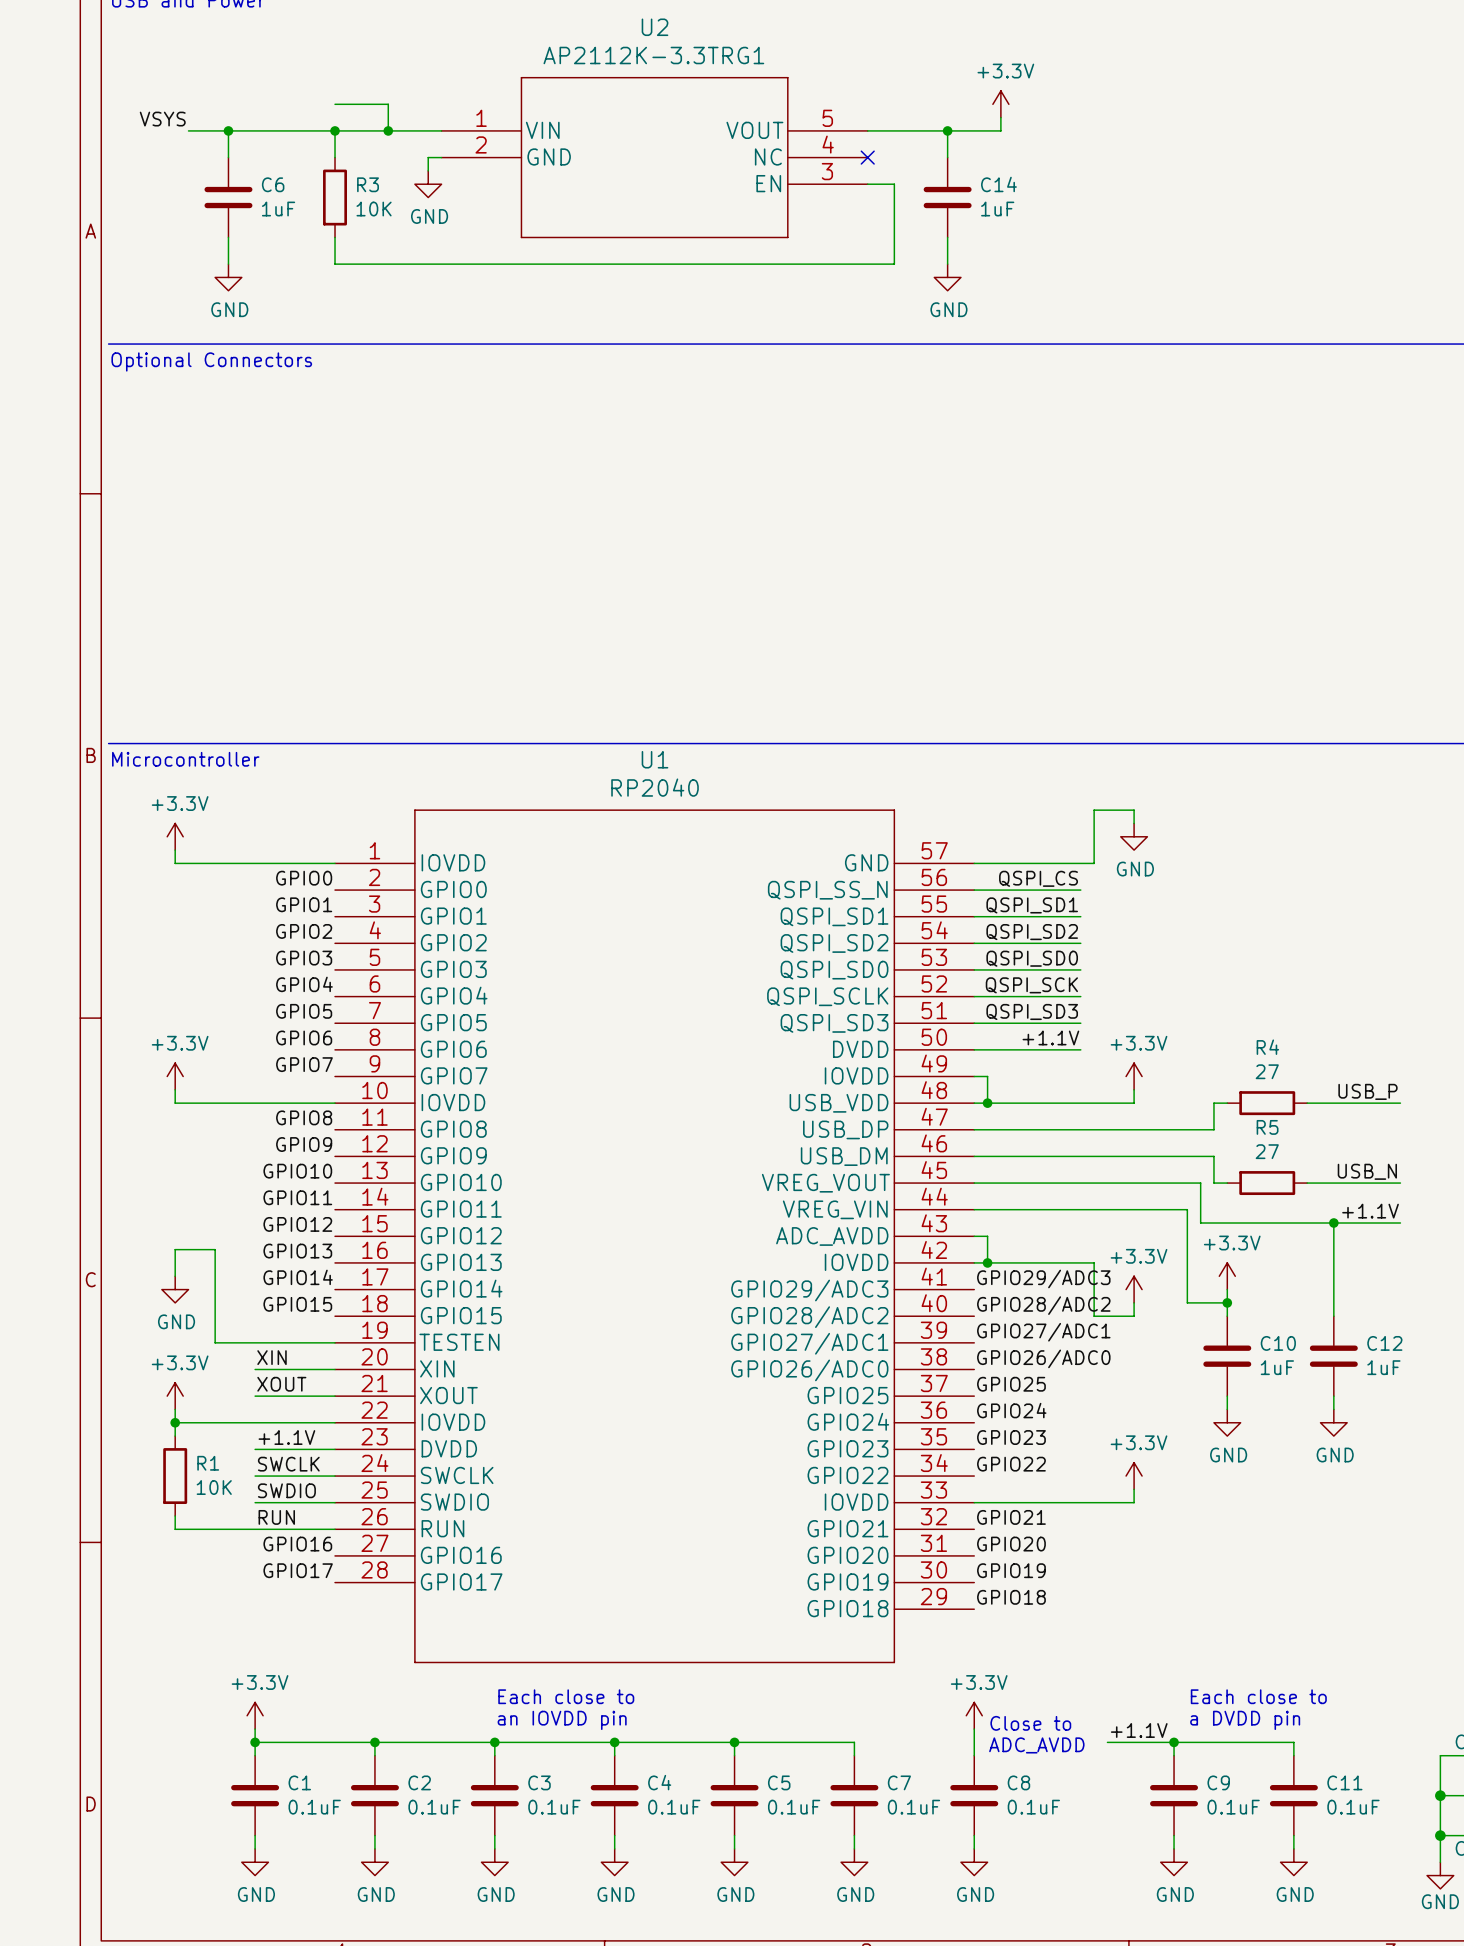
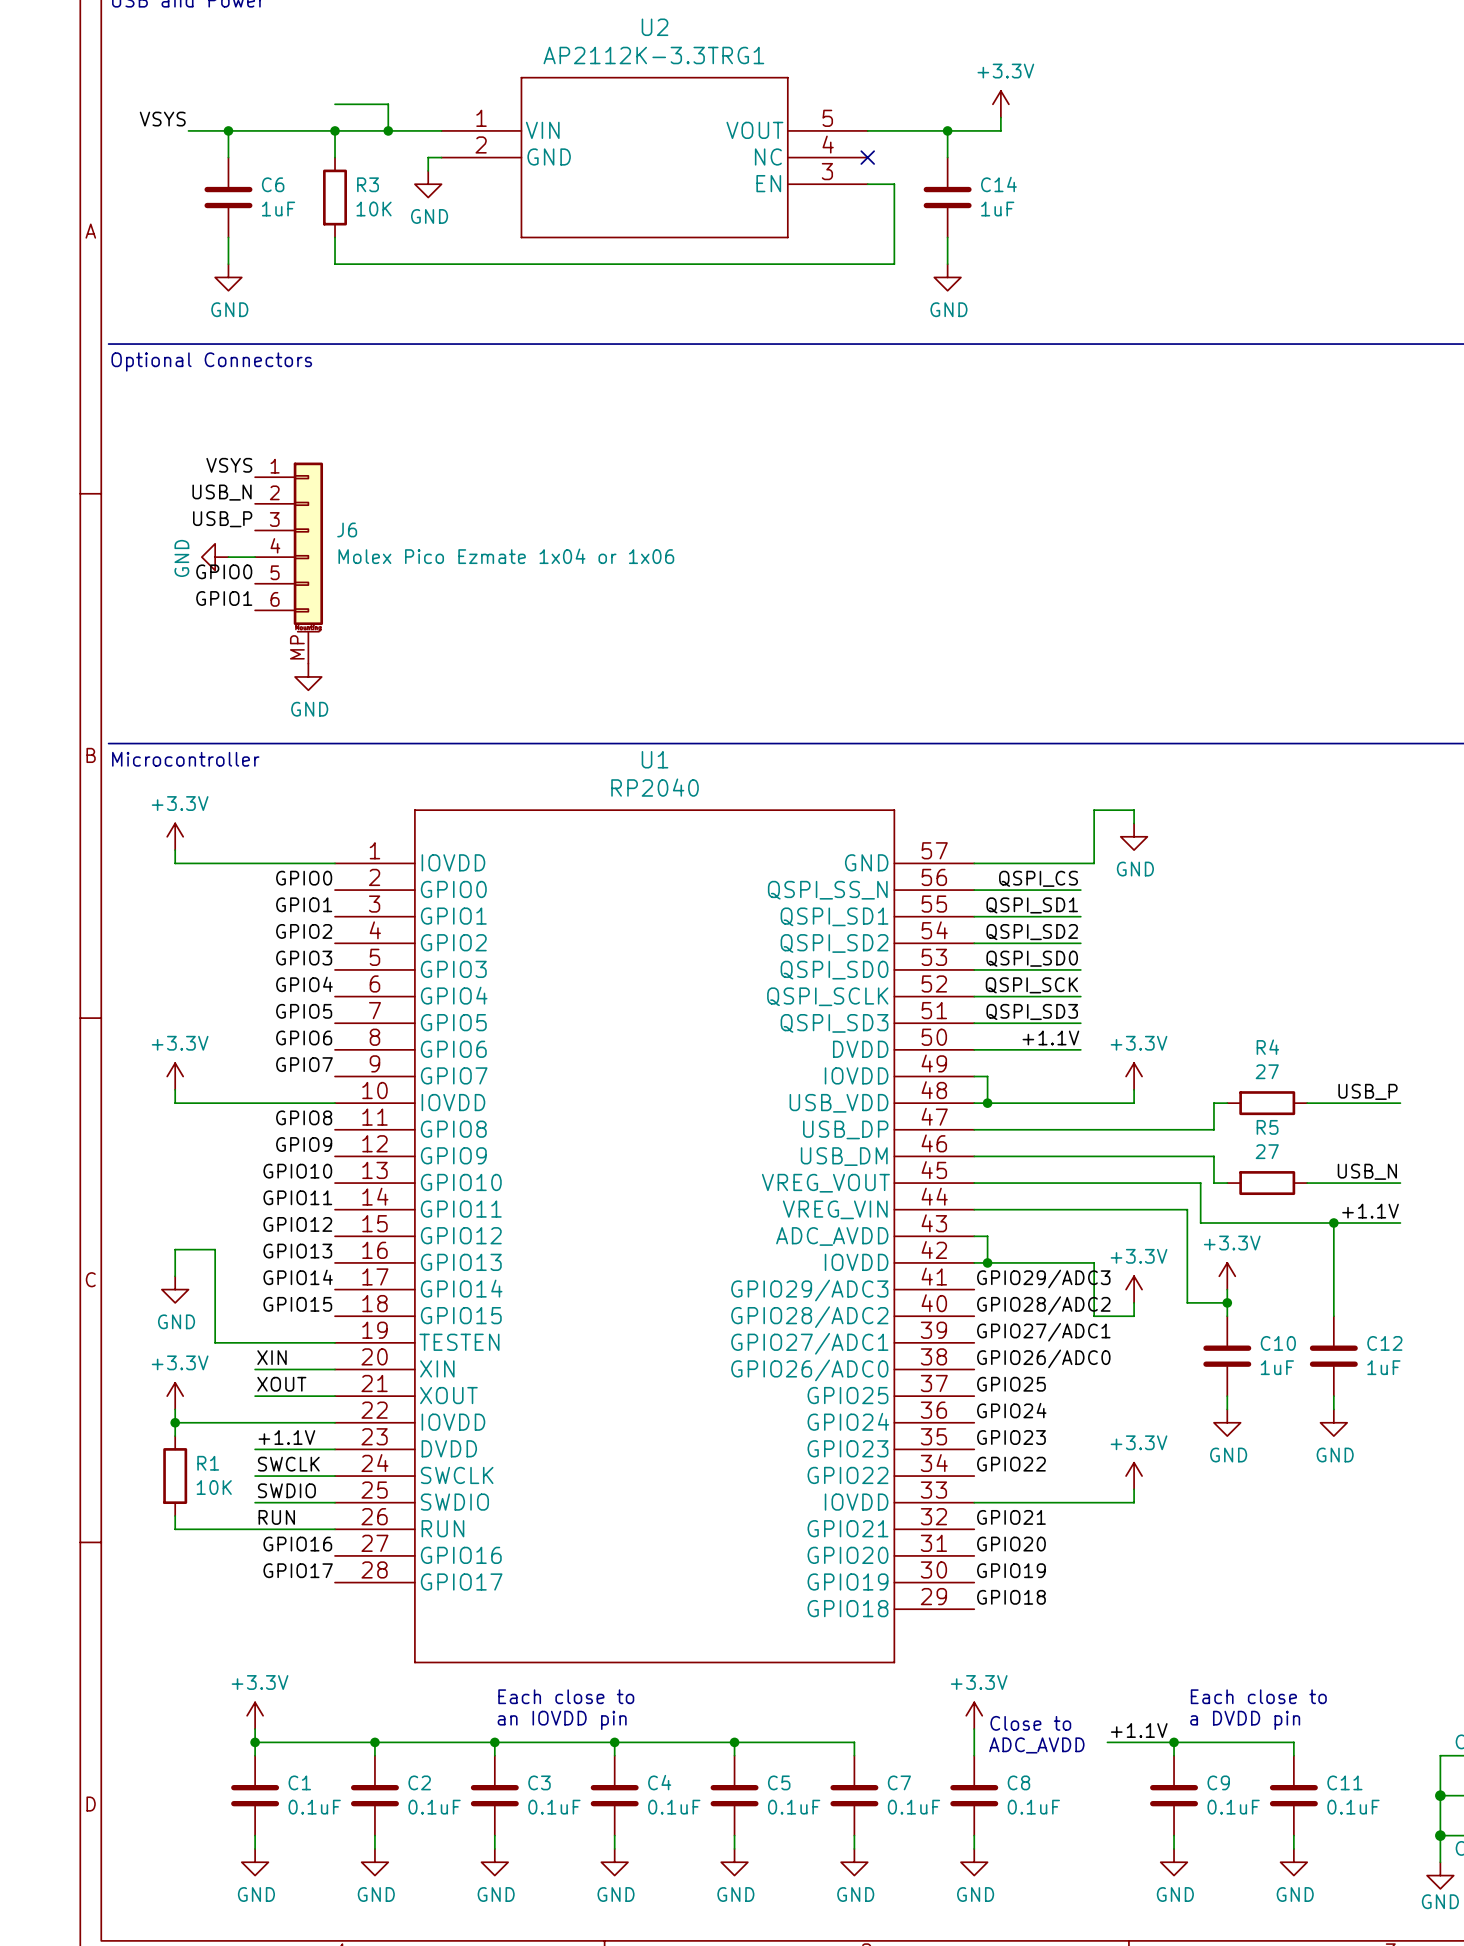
label: none -> VSYS (229, 465)
label: none -> USB_N (222, 492)
label: none -> USB_P (222, 519)
power symbol: none -> GND (215, 557)
wire: none -> (228, 557) (255, 557)
J6: none -> Molex Pico Ezmate 1x04 or 1x06 (289, 563)
label: none -> GPIO0 (224, 571)
label: none -> GPIO1 (224, 598)
power symbol: none -> GND (308, 676)

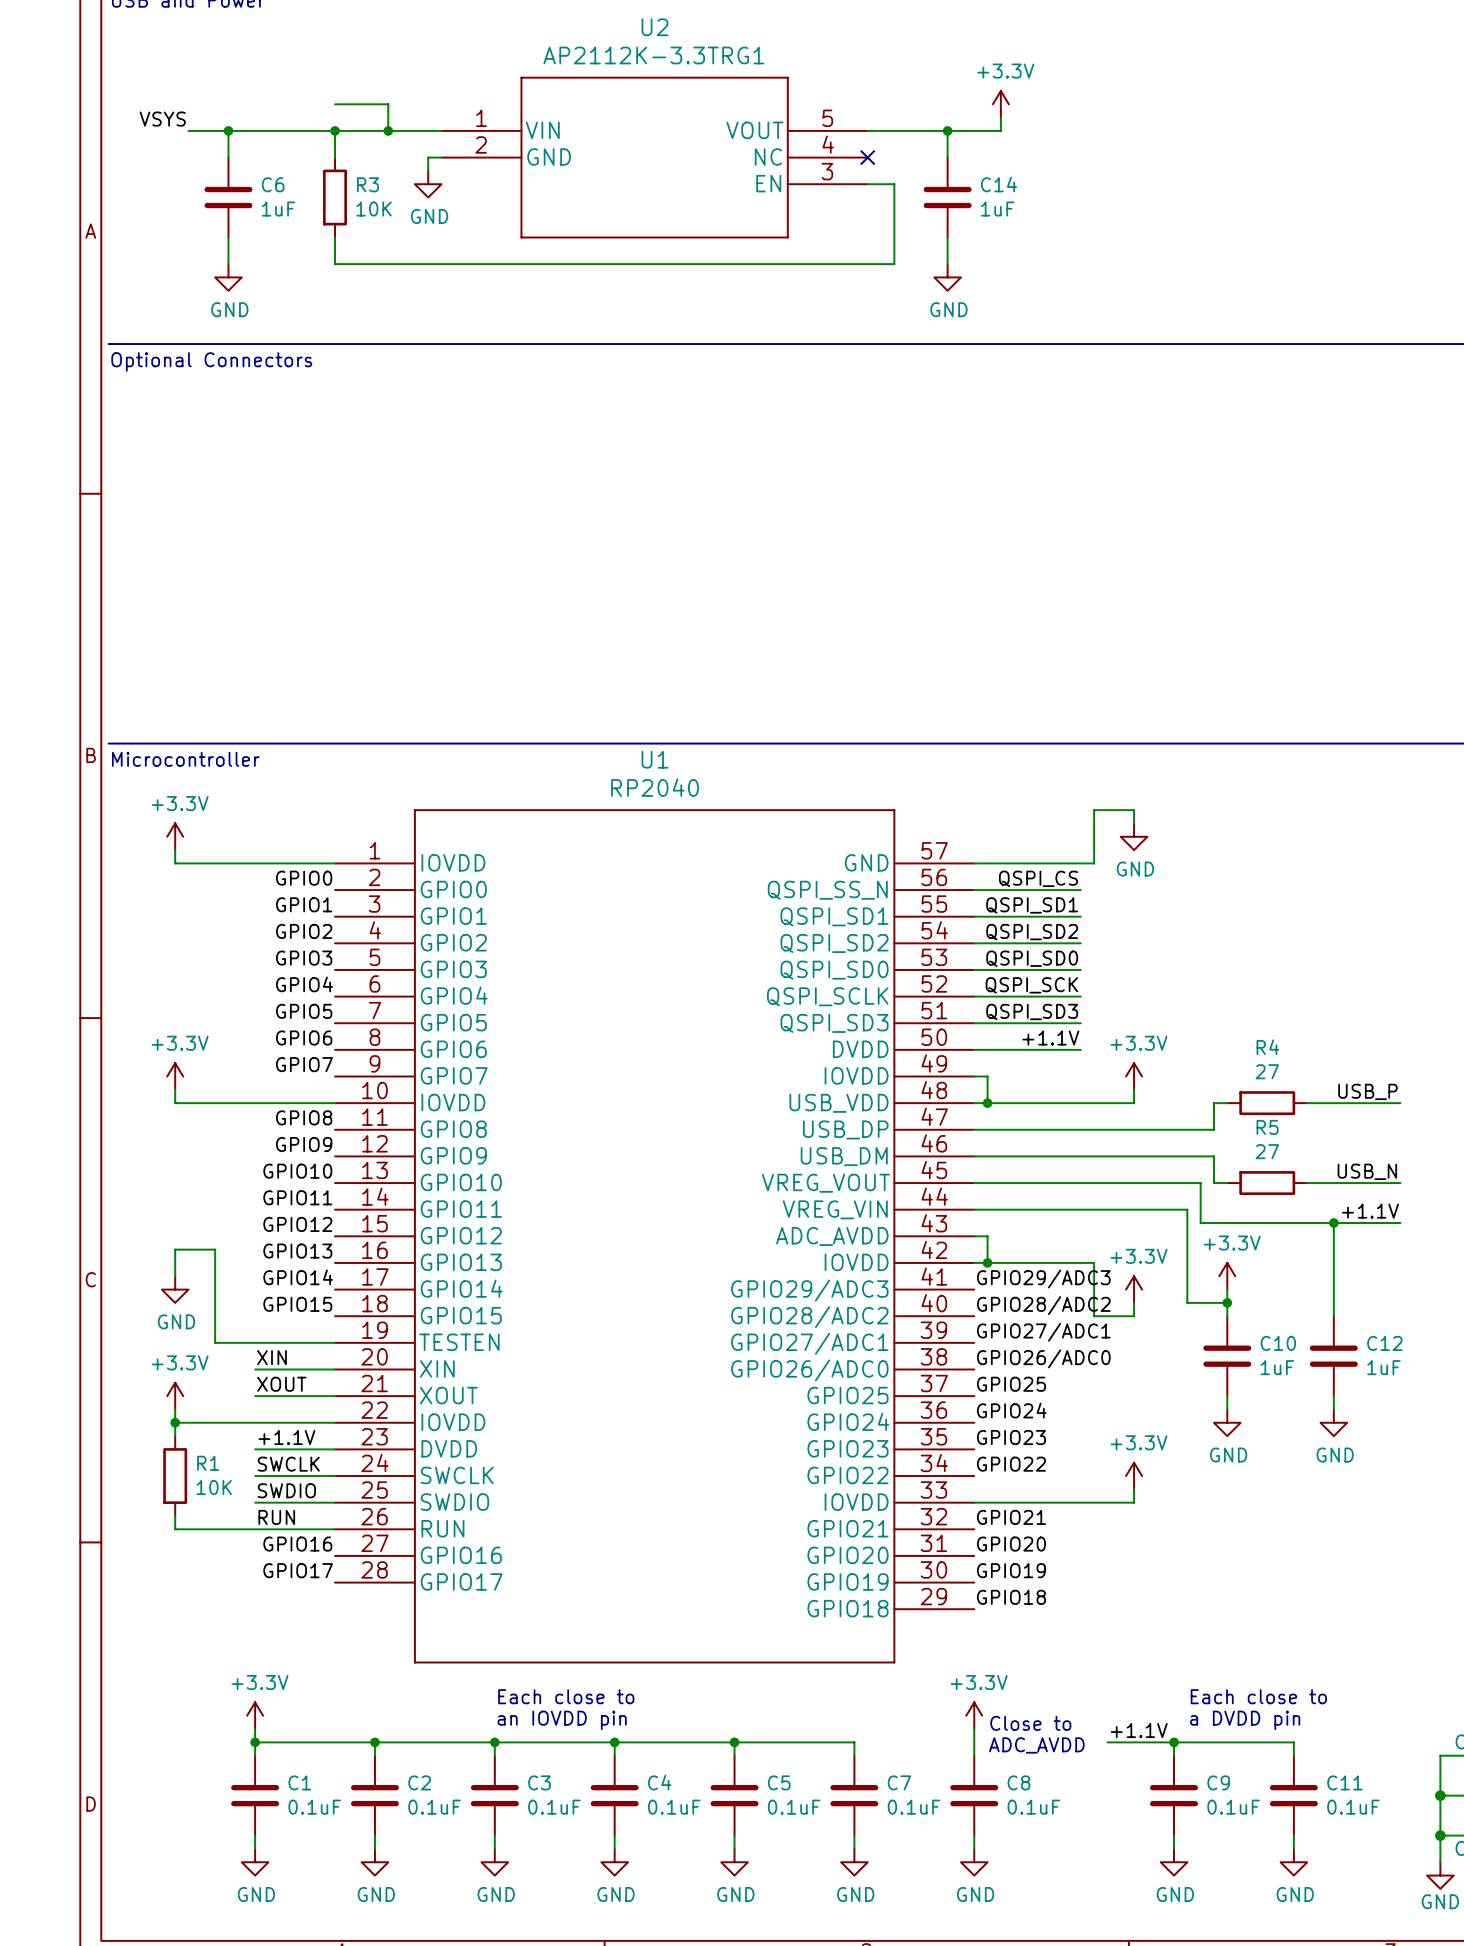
label: VSYS (229, 465) -> none
label: USB_N (222, 492) -> none
label: USB_P (222, 519) -> none
power symbol: GND (215, 557) -> none
wire: (228, 557) (255, 557) -> none
J6: Molex Pico Ezmate 1x04 or 1x06 (289, 563) -> none
label: GPIO0 (224, 571) -> none
label: GPIO1 (224, 598) -> none
power symbol: GND (308, 676) -> none

